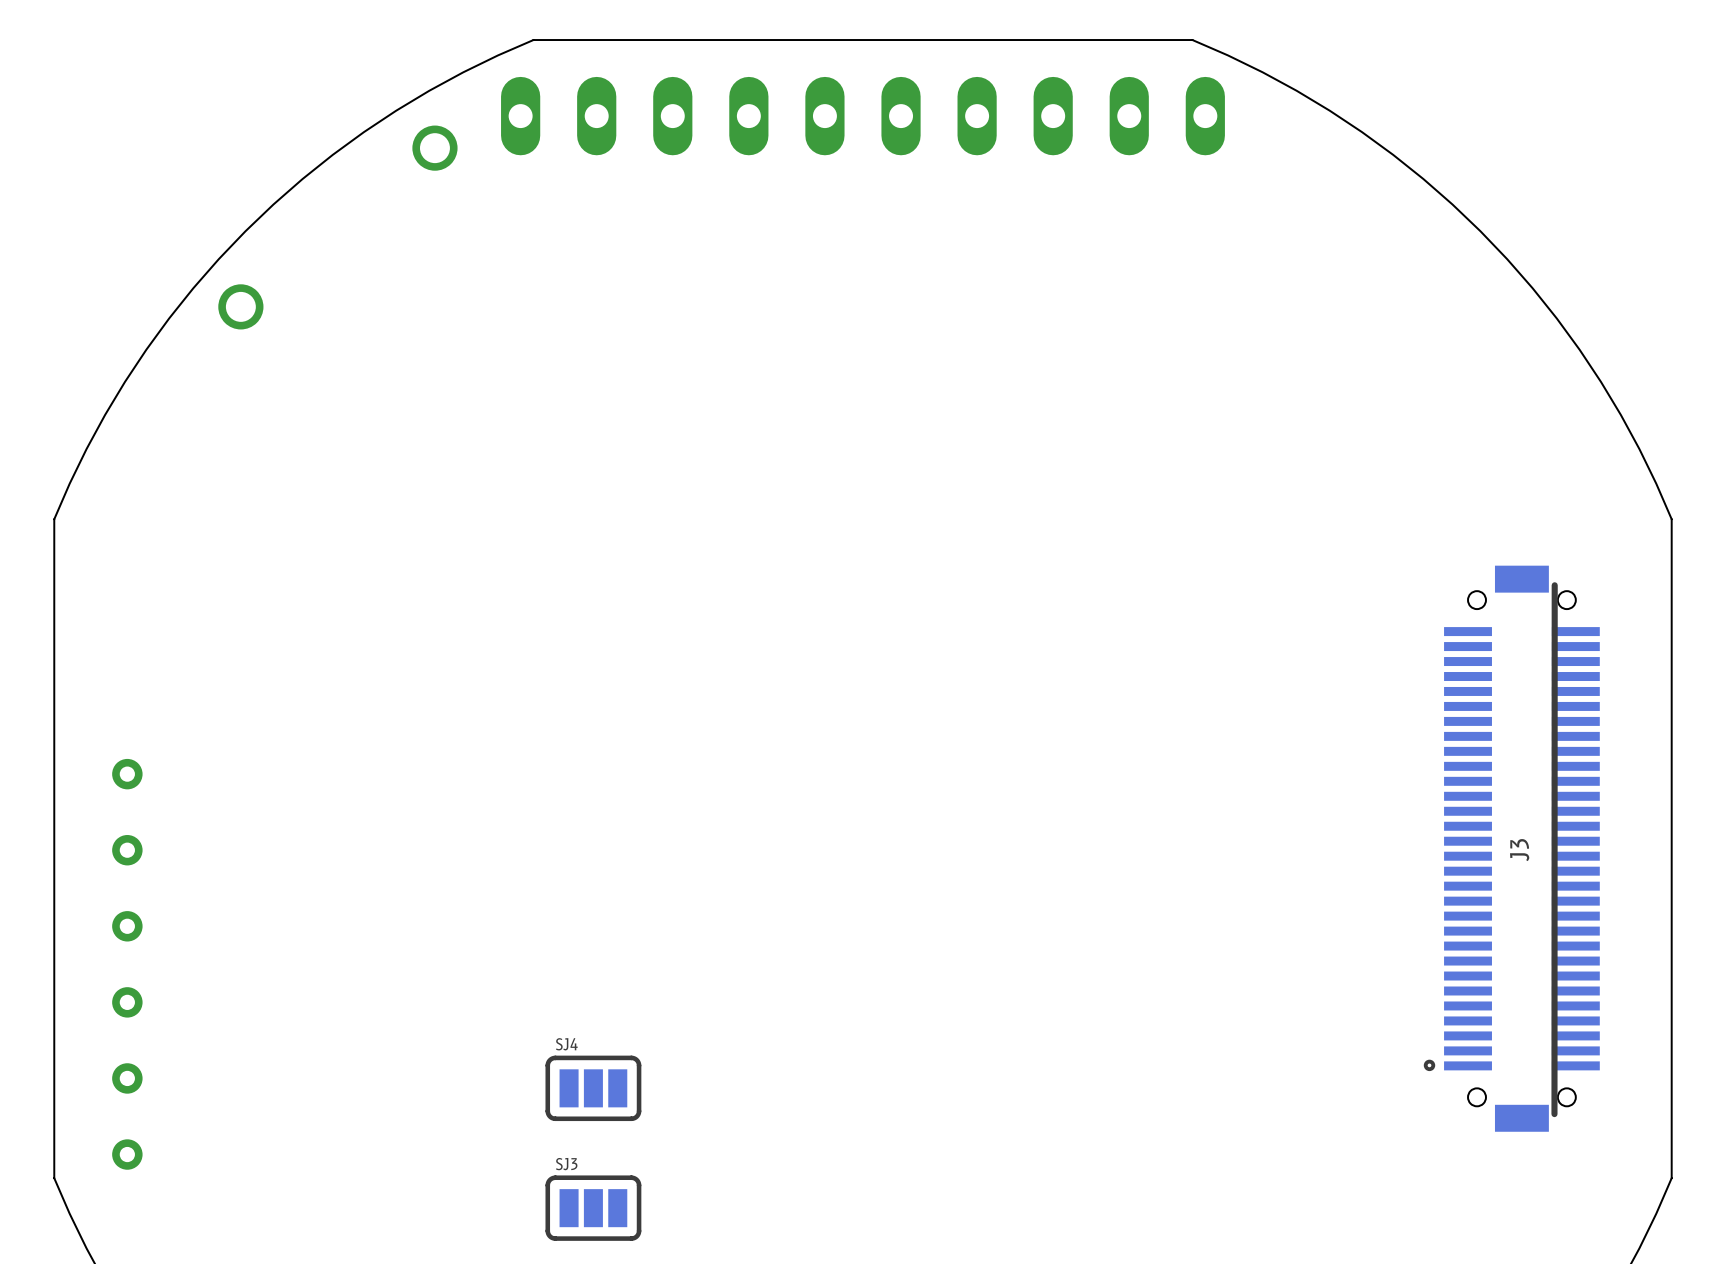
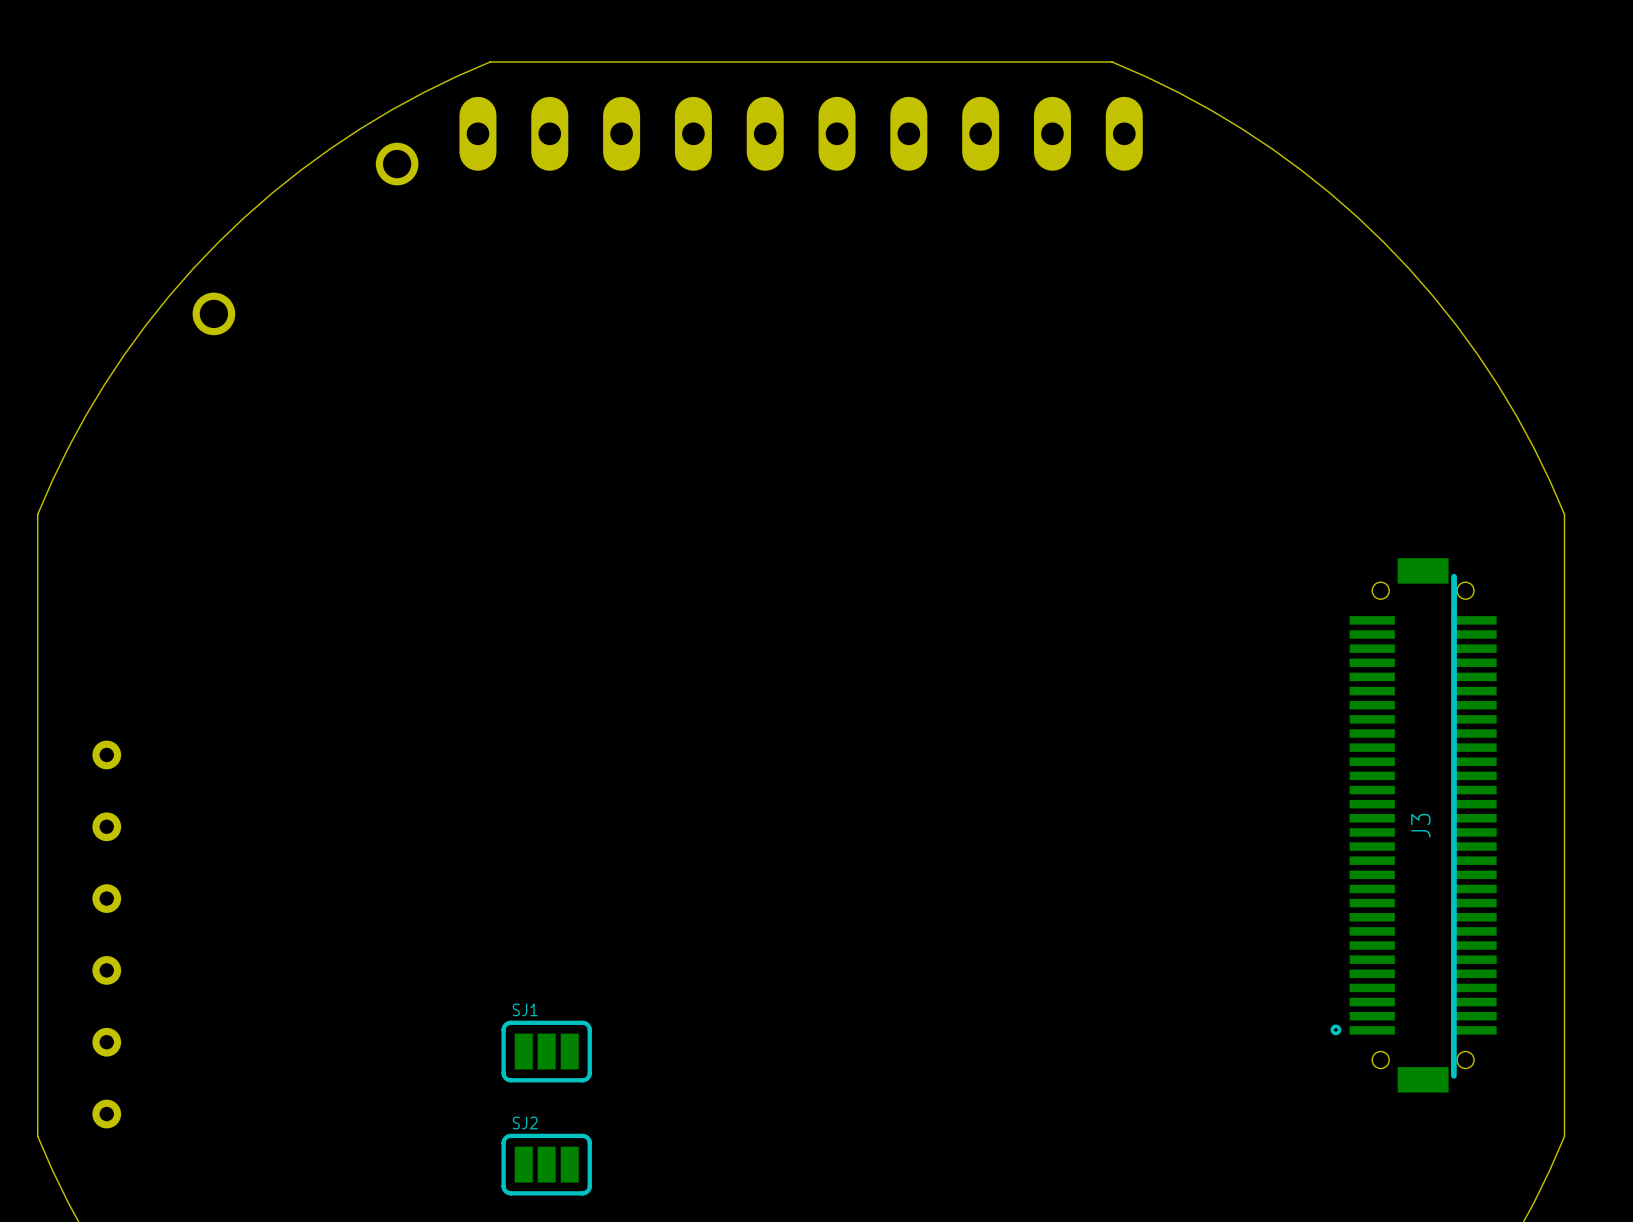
SJ4 name: SJ4 (566, 1044) -> SJ1 (525, 1009)
SJ3 name: SJ3 (566, 1164) -> SJ2 (525, 1122)

